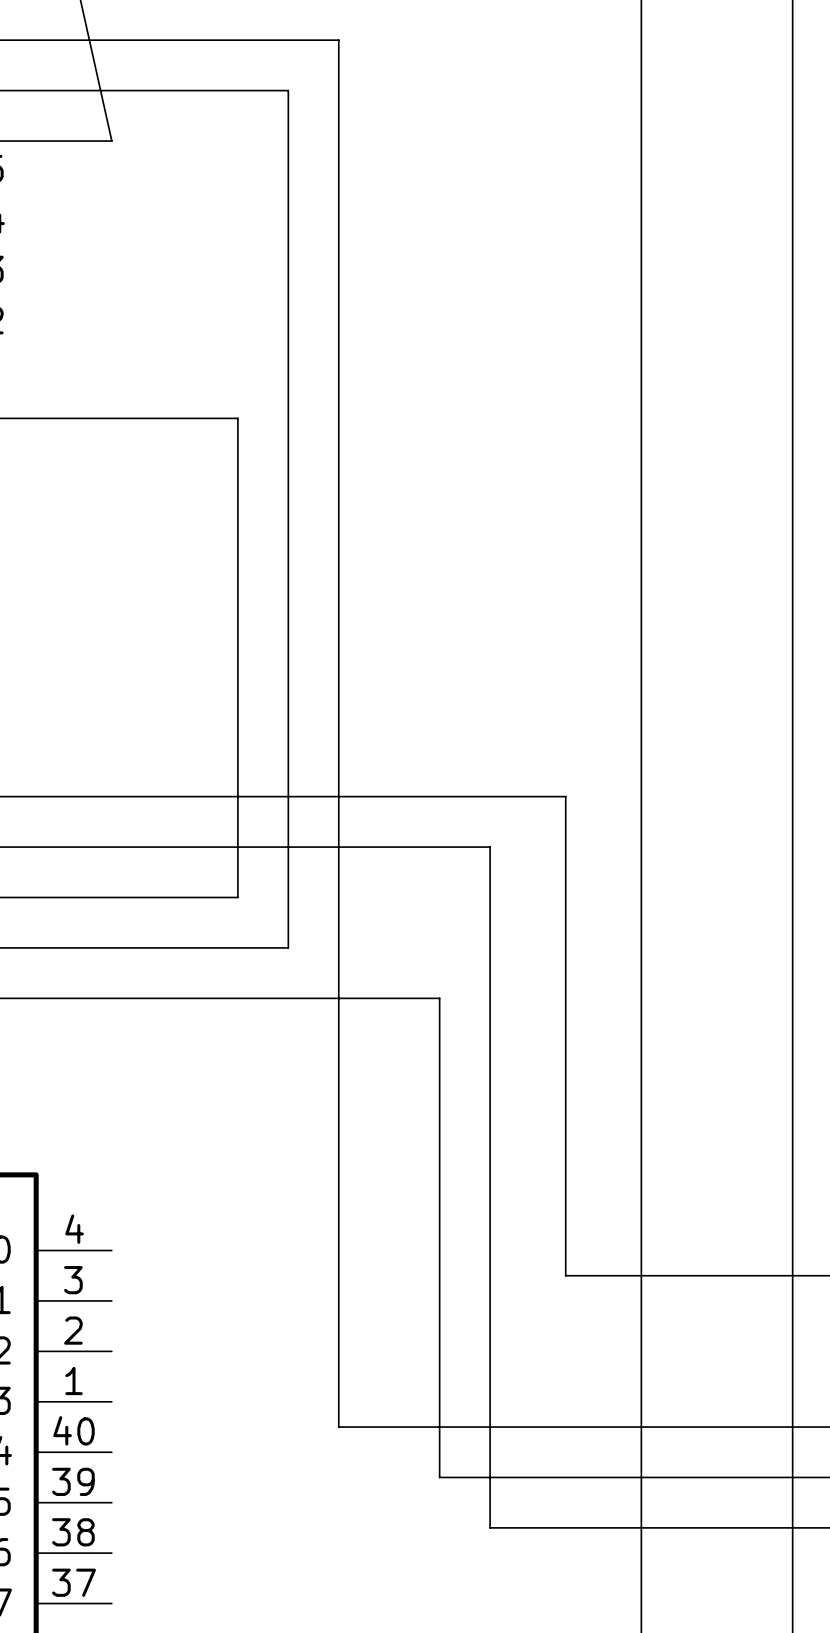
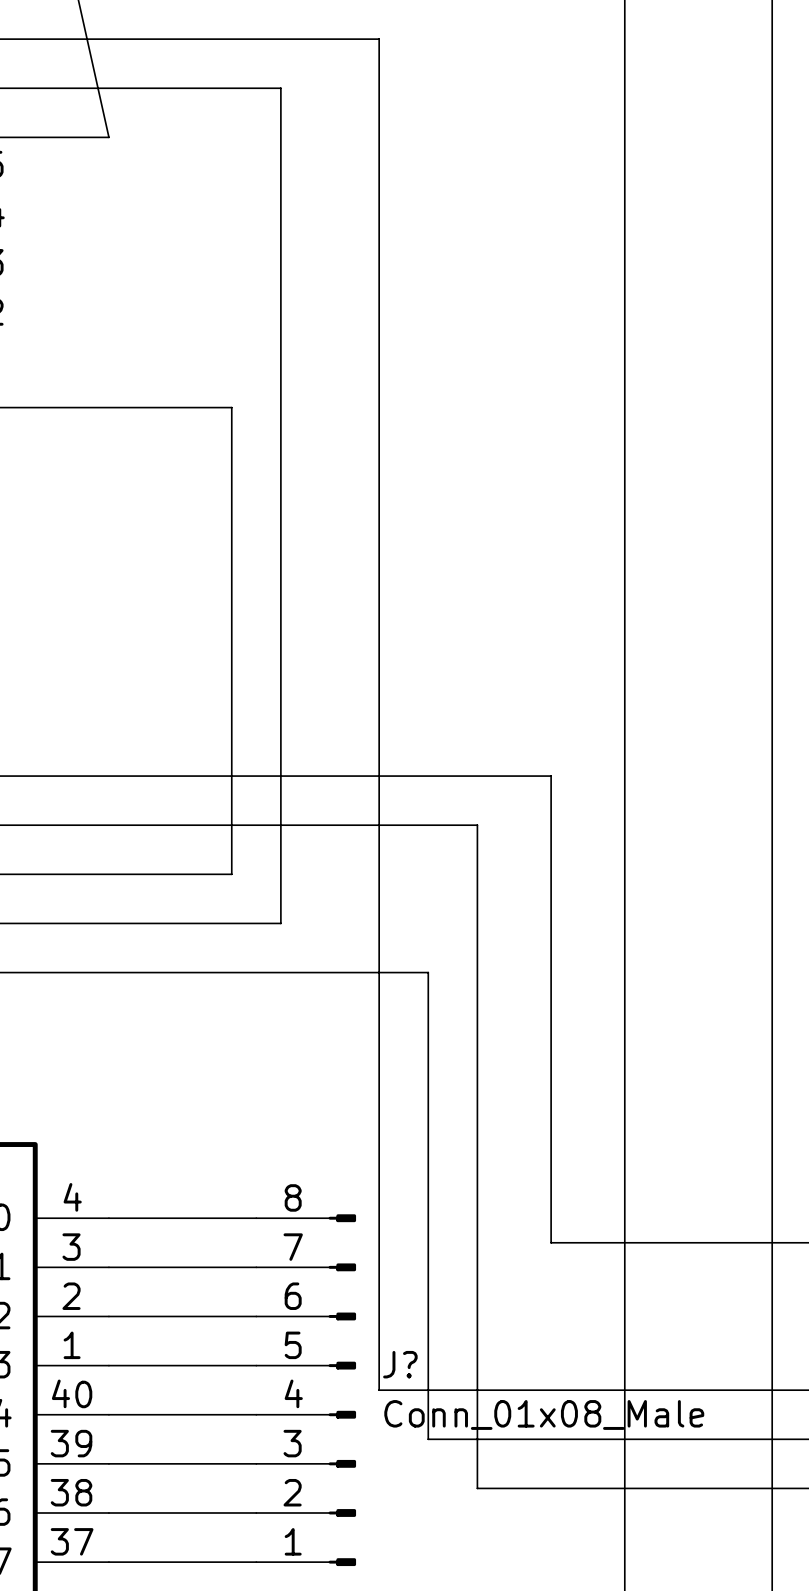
wire: (338, 40) (338, 1427) (389, 1427) -> (330, 39) (379, 39) (379, 1390)
wire: none -> (108, 1218) (256, 1218)
wire: none -> (108, 1267) (256, 1267)
wire: none -> (108, 1316) (256, 1316)
wire: none -> (108, 1365) (256, 1365)
J?: none -> Conn_01x08_Male (306, 1390)
wire: none -> (108, 1414) (256, 1414)
wire: none -> (108, 1463) (256, 1463)
wire: none -> (108, 1512) (256, 1512)
wire: none -> (108, 1562) (256, 1562)

